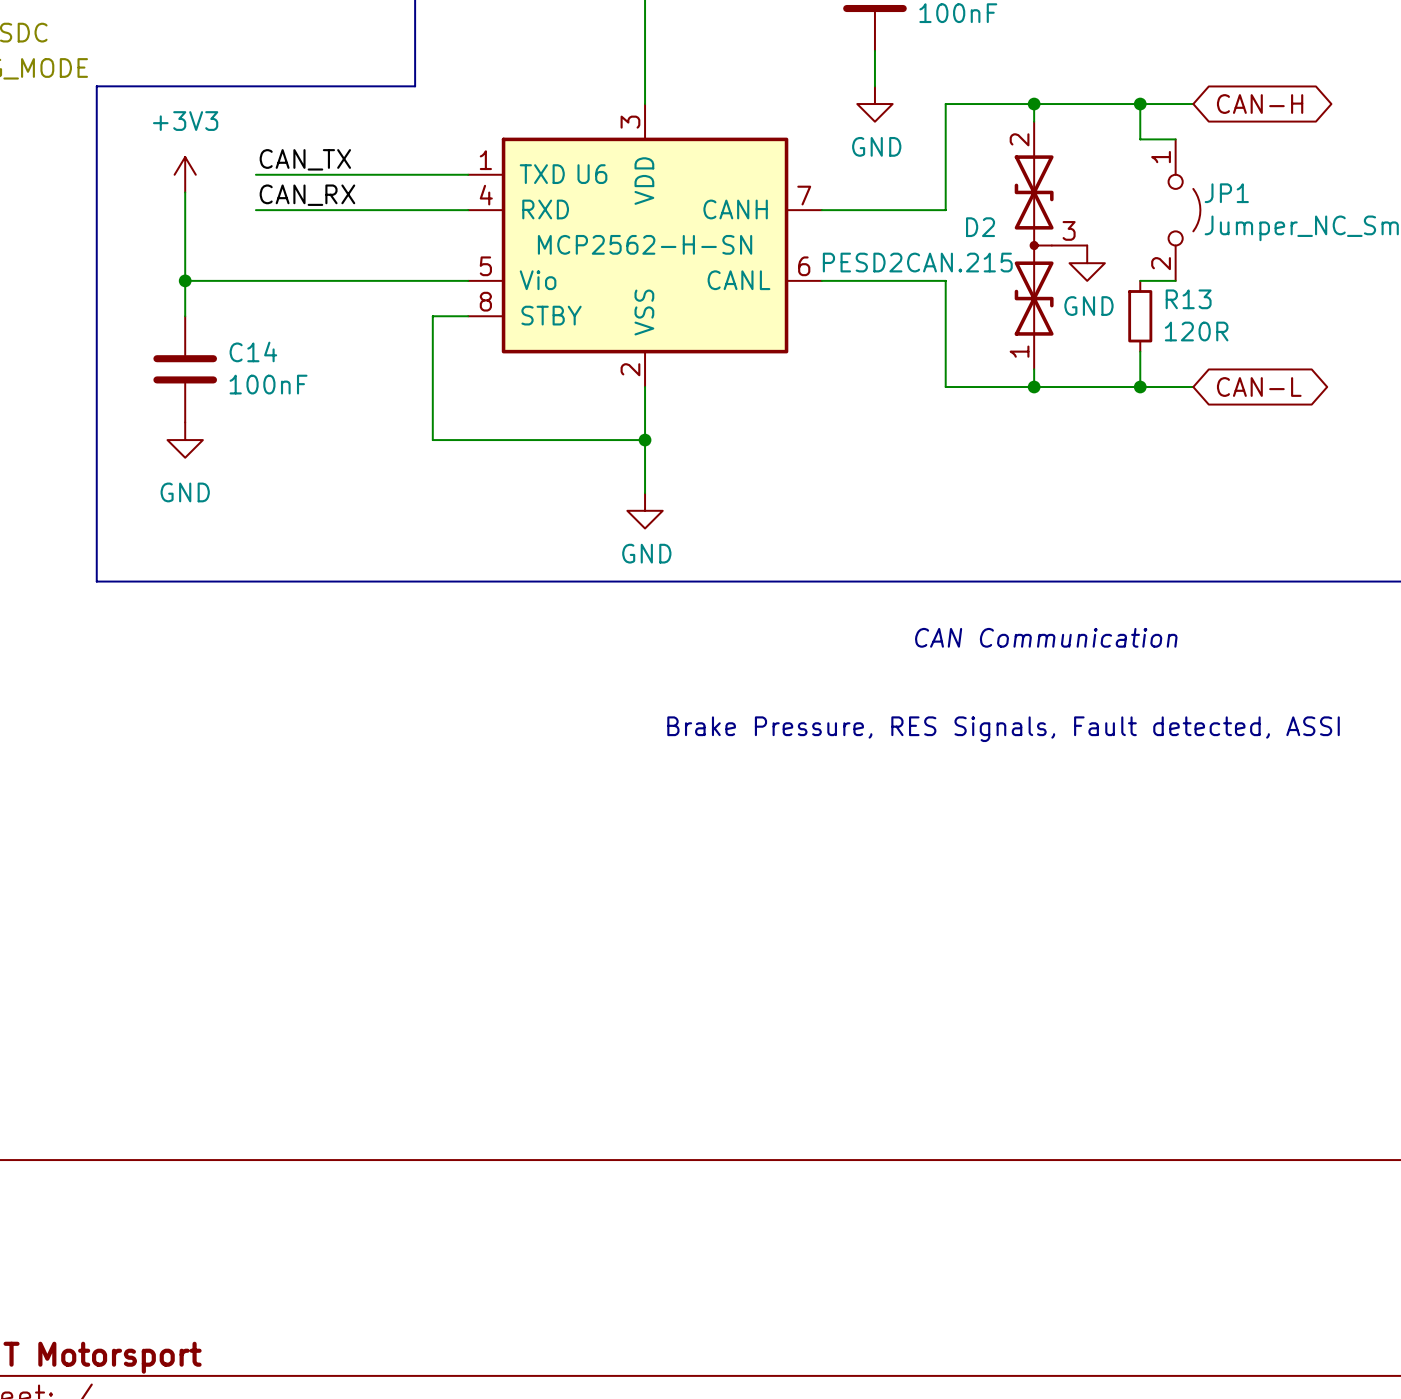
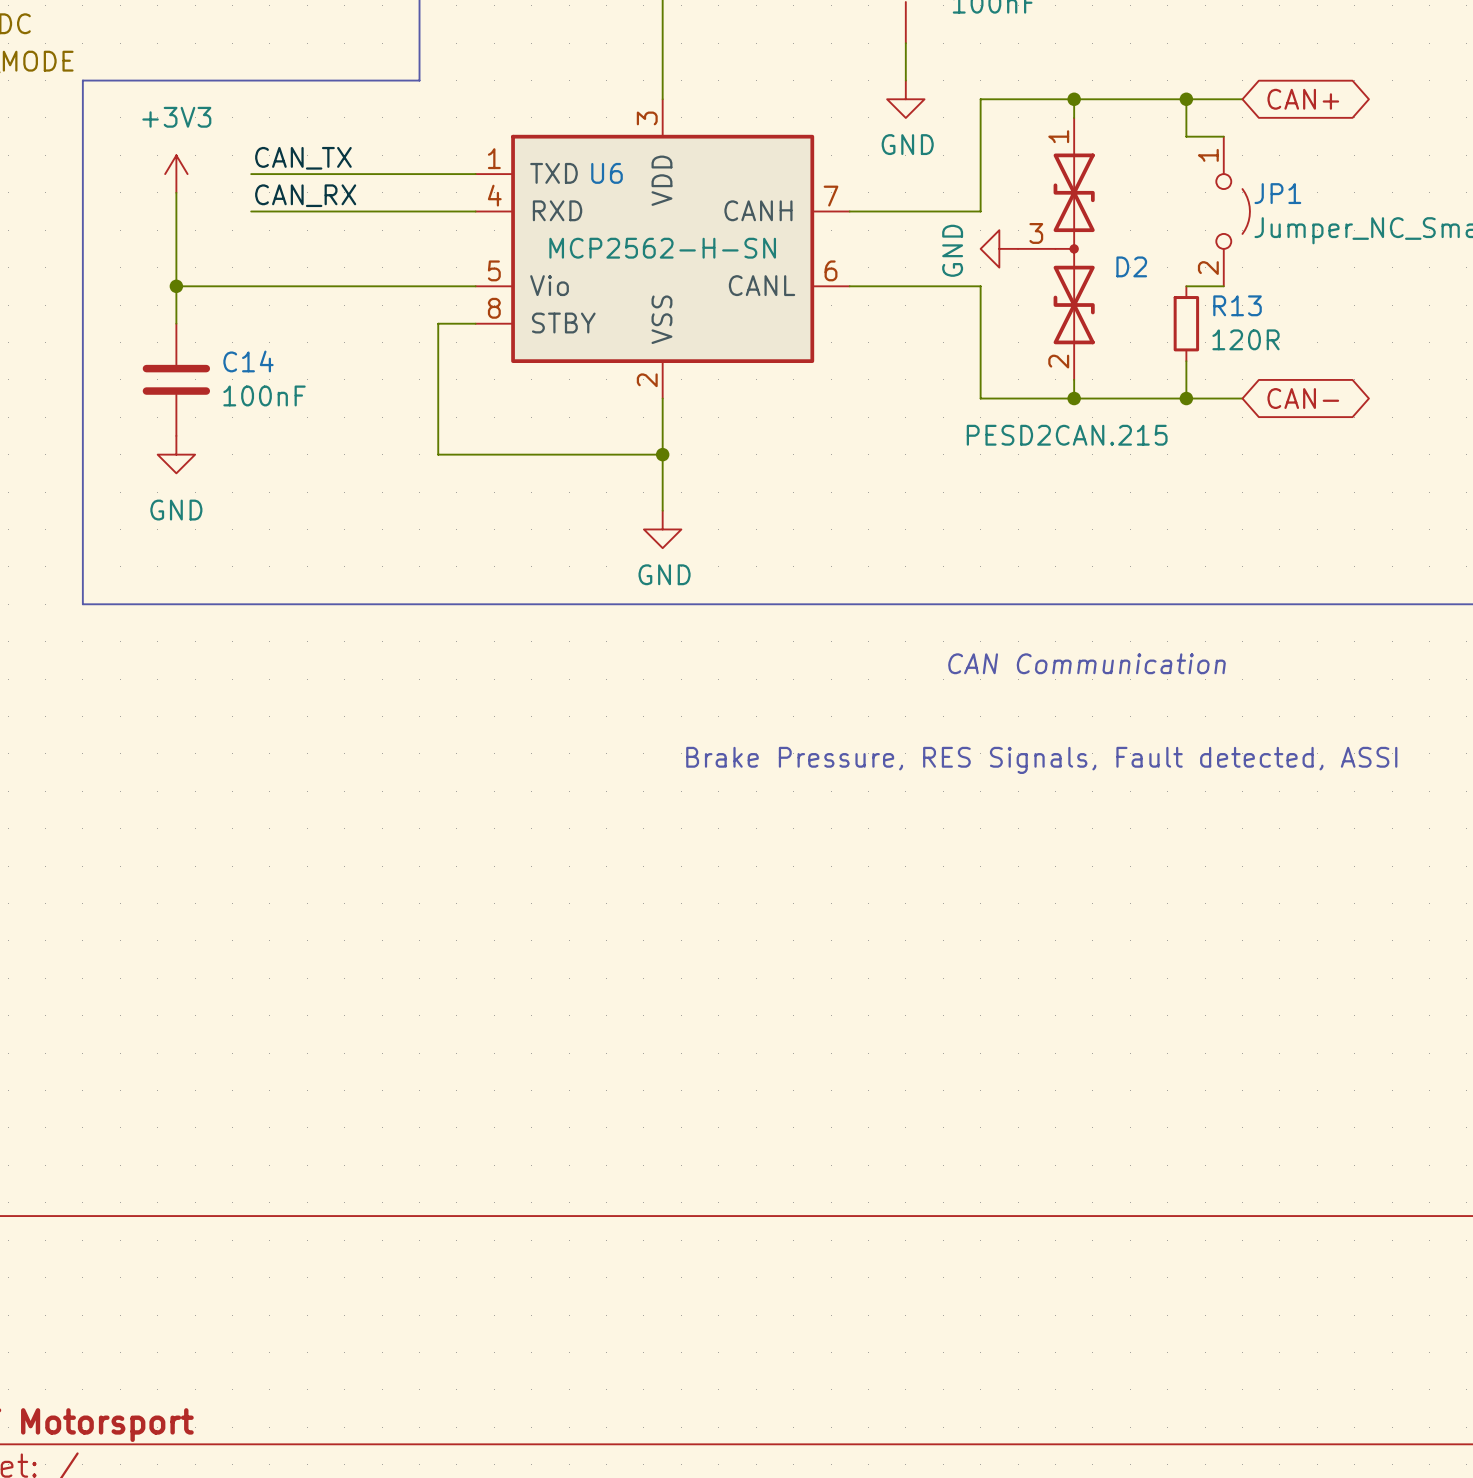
global label: CAN-H (1260, 104) -> CAN+ (1303, 99)
D2 rotation: 0° (1034, 245) -> 180° (1074, 248)
D2 value position: PESD2CAN.215 (917, 262) -> PESD2CAN.215 (1067, 435)
power symbol rotation: 0° (1087, 263) -> 90° clockwise (999, 248)
power symbol position: GND (1087, 263) -> GND (999, 248)
global label: CAN-L (1259, 387) -> CAN- (1303, 398)

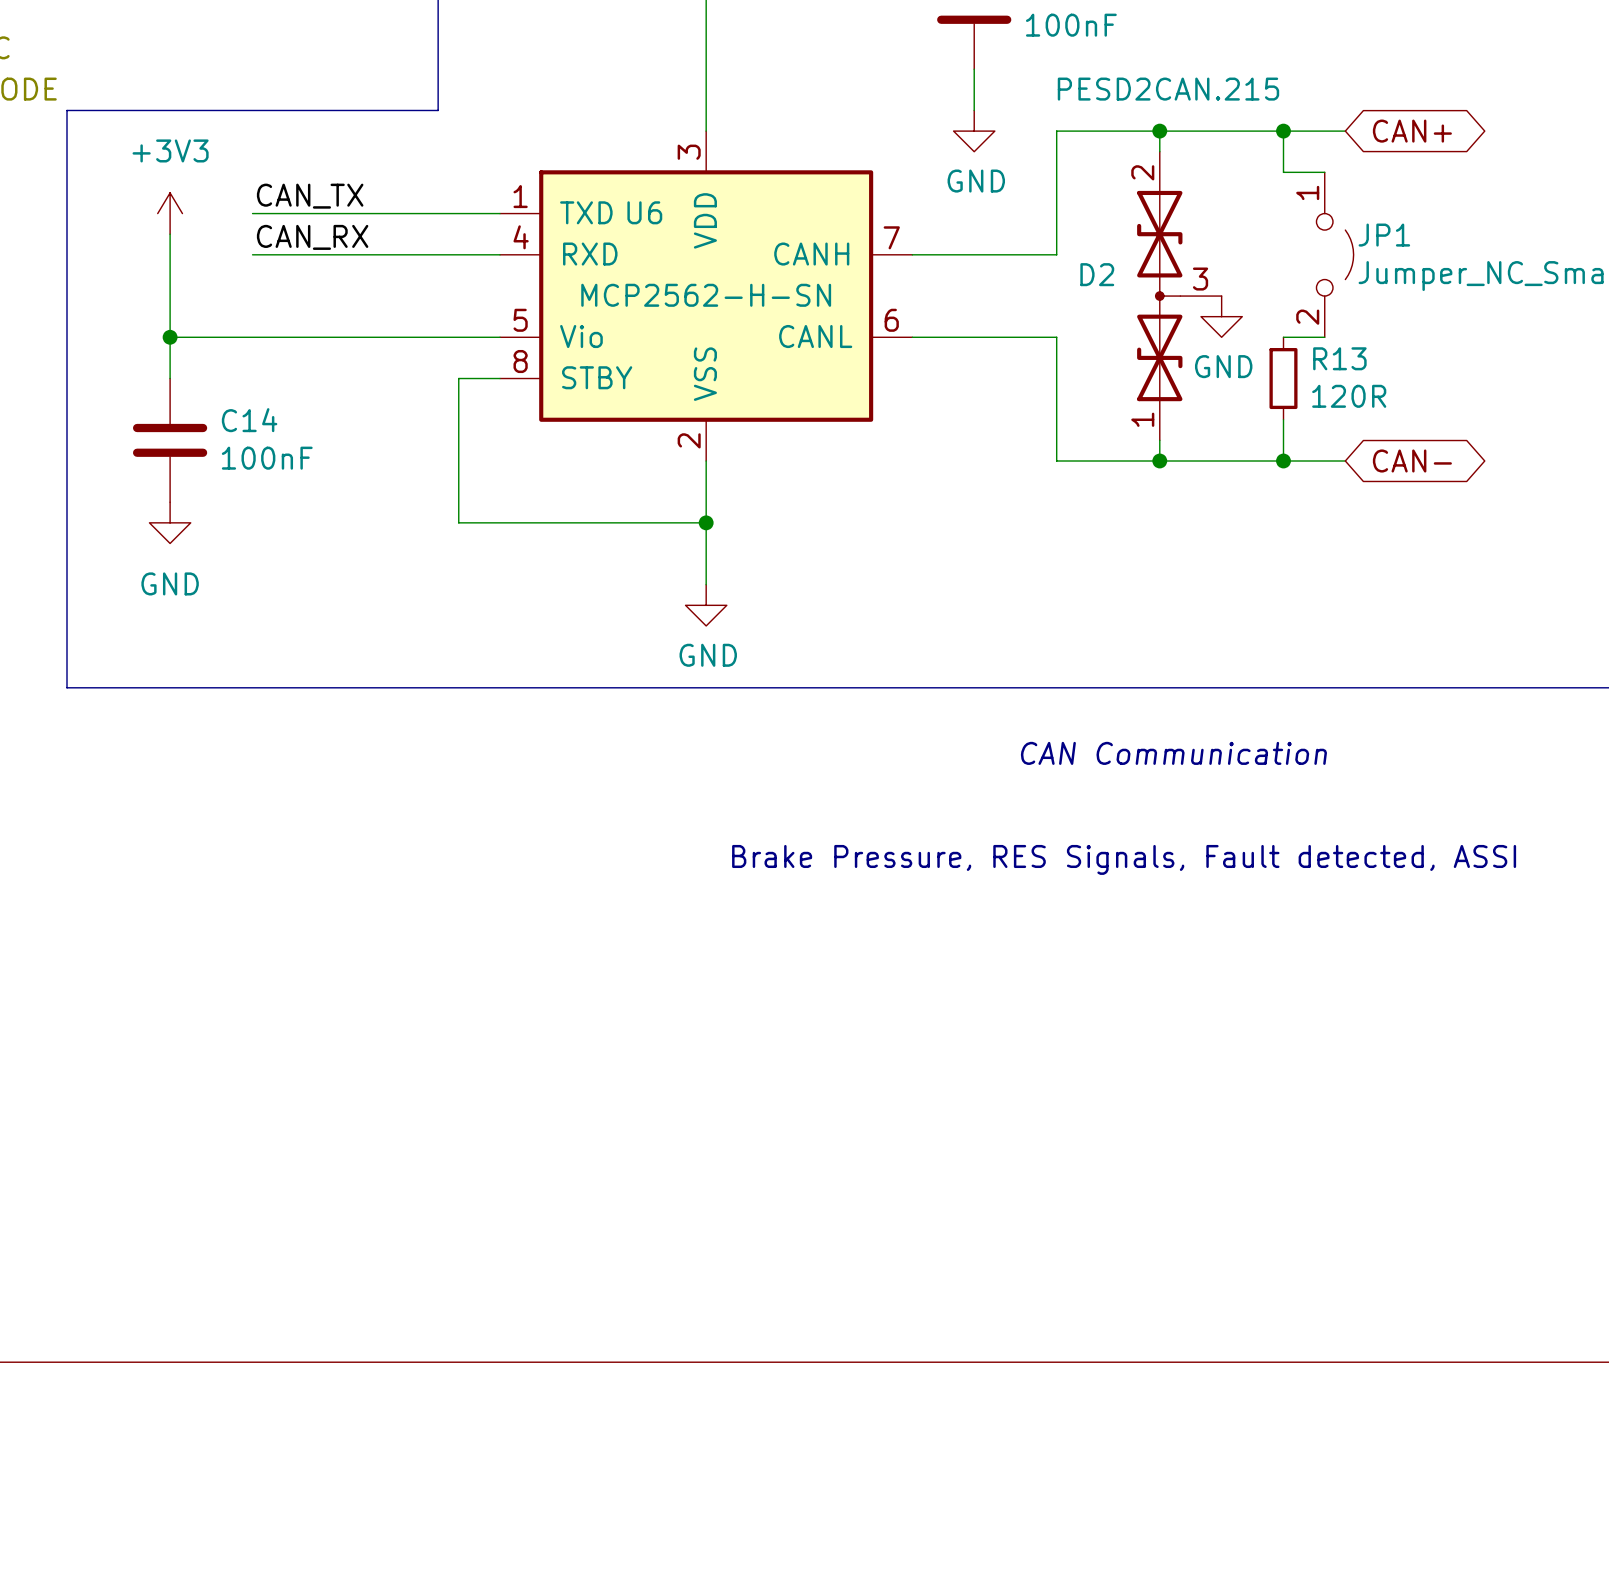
power symbol rotation: 0° (999, 248) -> 90° counterclockwise (1221, 316)
power symbol position: GND (999, 248) -> GND (1221, 316)
D2 rotation: 0° (1074, 248) -> 180° (1159, 296)

